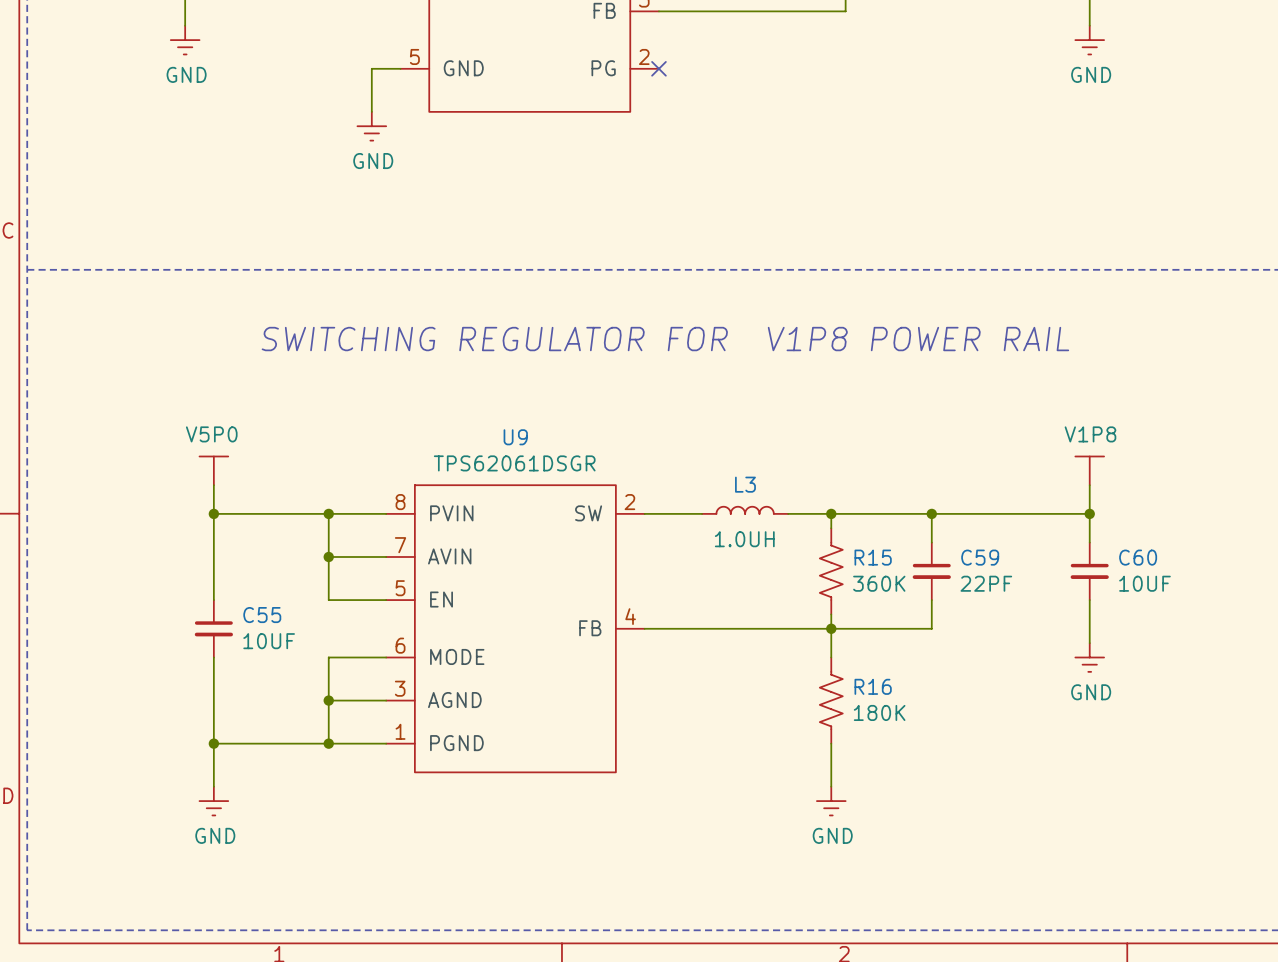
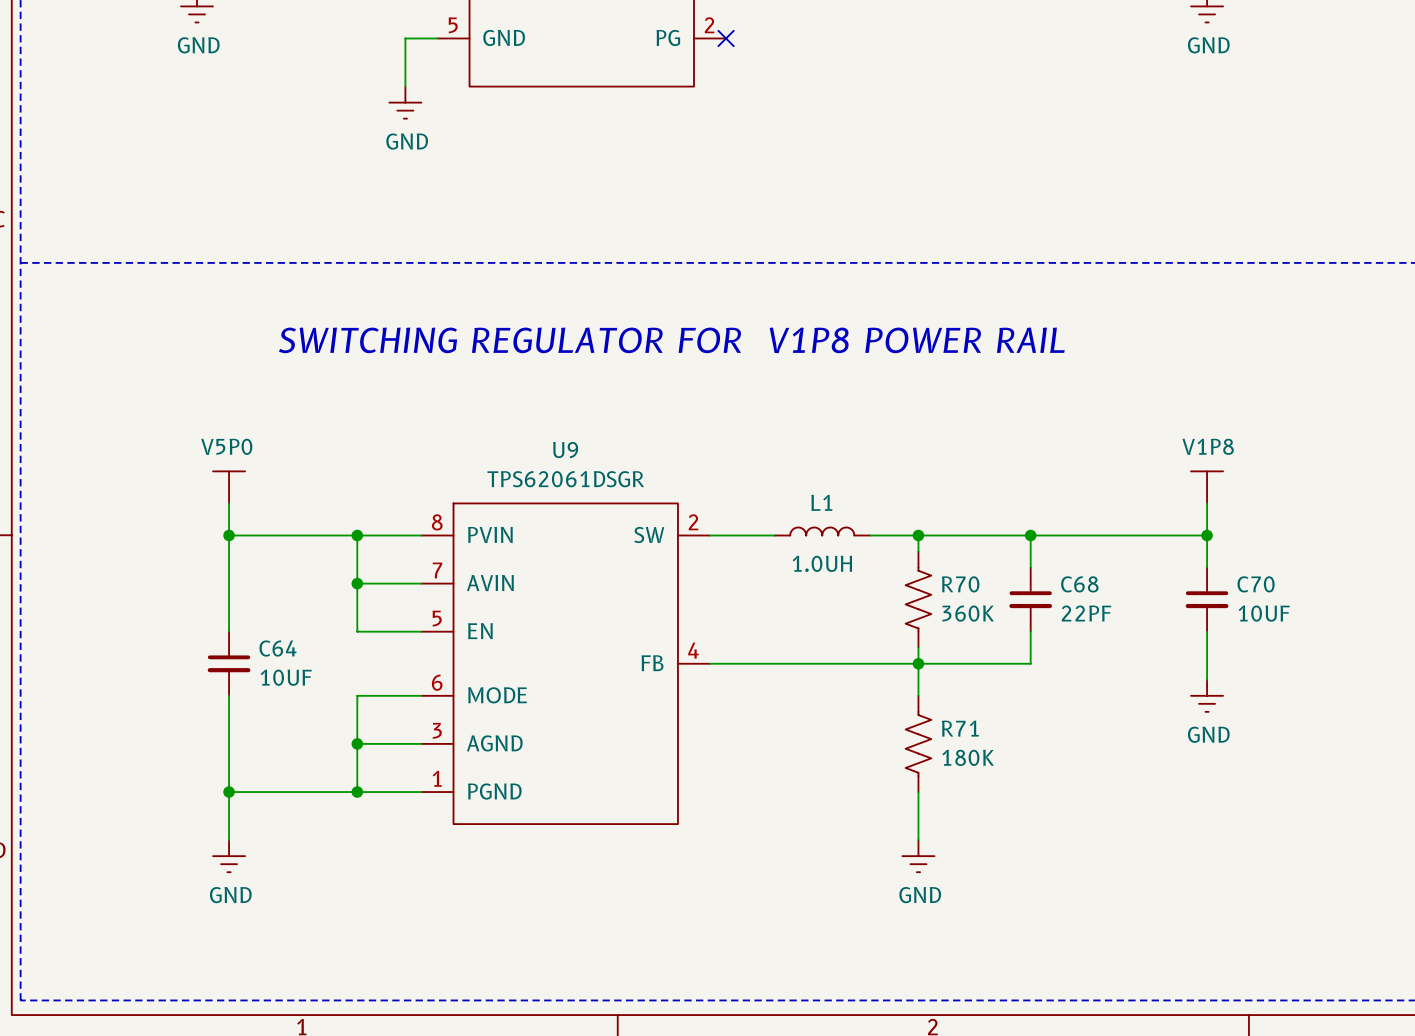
L3 name: L3 (745, 484) -> L1 (821, 502)
R15 name: R15 (873, 557) -> R70 (960, 584)
C59 name: C59 (980, 557) -> C68 (1079, 584)
C60 name: C60 (1138, 557) -> C70 (1256, 584)
C55 name: C55 (262, 615) -> C64 (278, 648)
R16 name: R16 (873, 686) -> R71 (960, 728)

